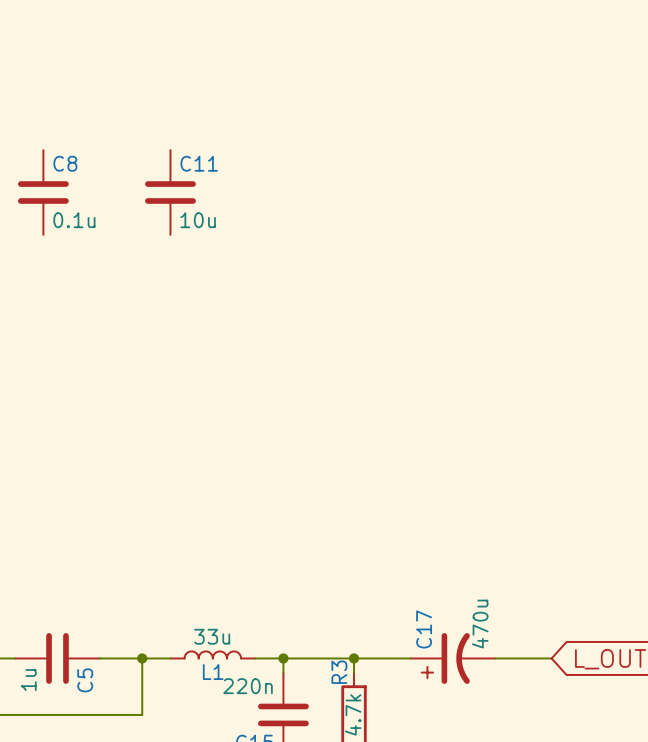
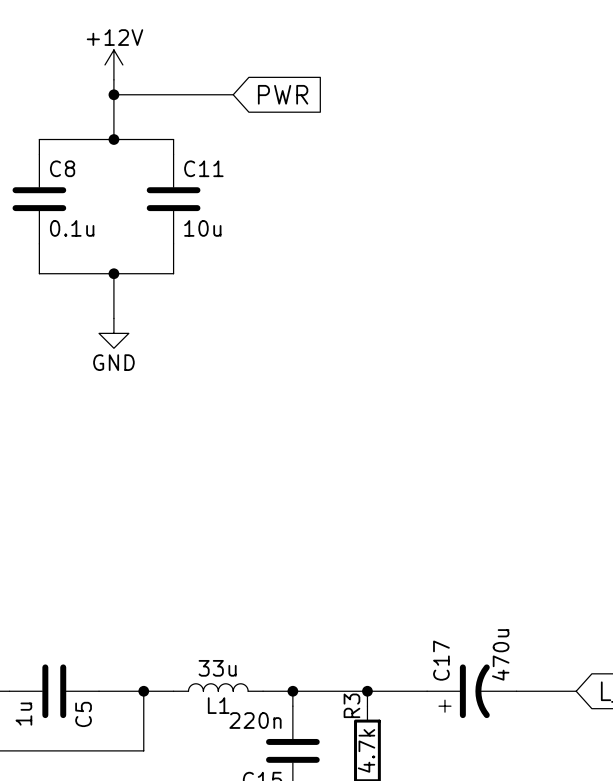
power symbol: none -> +12V (113, 64)
wire: none -> (113, 79) (113, 139)
wire: none -> (113, 94) (233, 94)
junction: none -> (113, 94)
global label: none -> PWR (283, 94)
junction: none -> (113, 139)
wire: none -> (39, 154) (39, 139) (173, 139) (173, 154)
wire: none -> (39, 243) (39, 273) (173, 273) (173, 243)
wire: none -> (113, 273) (113, 318)
junction: none -> (113, 273)
power symbol: none -> GND (113, 333)

